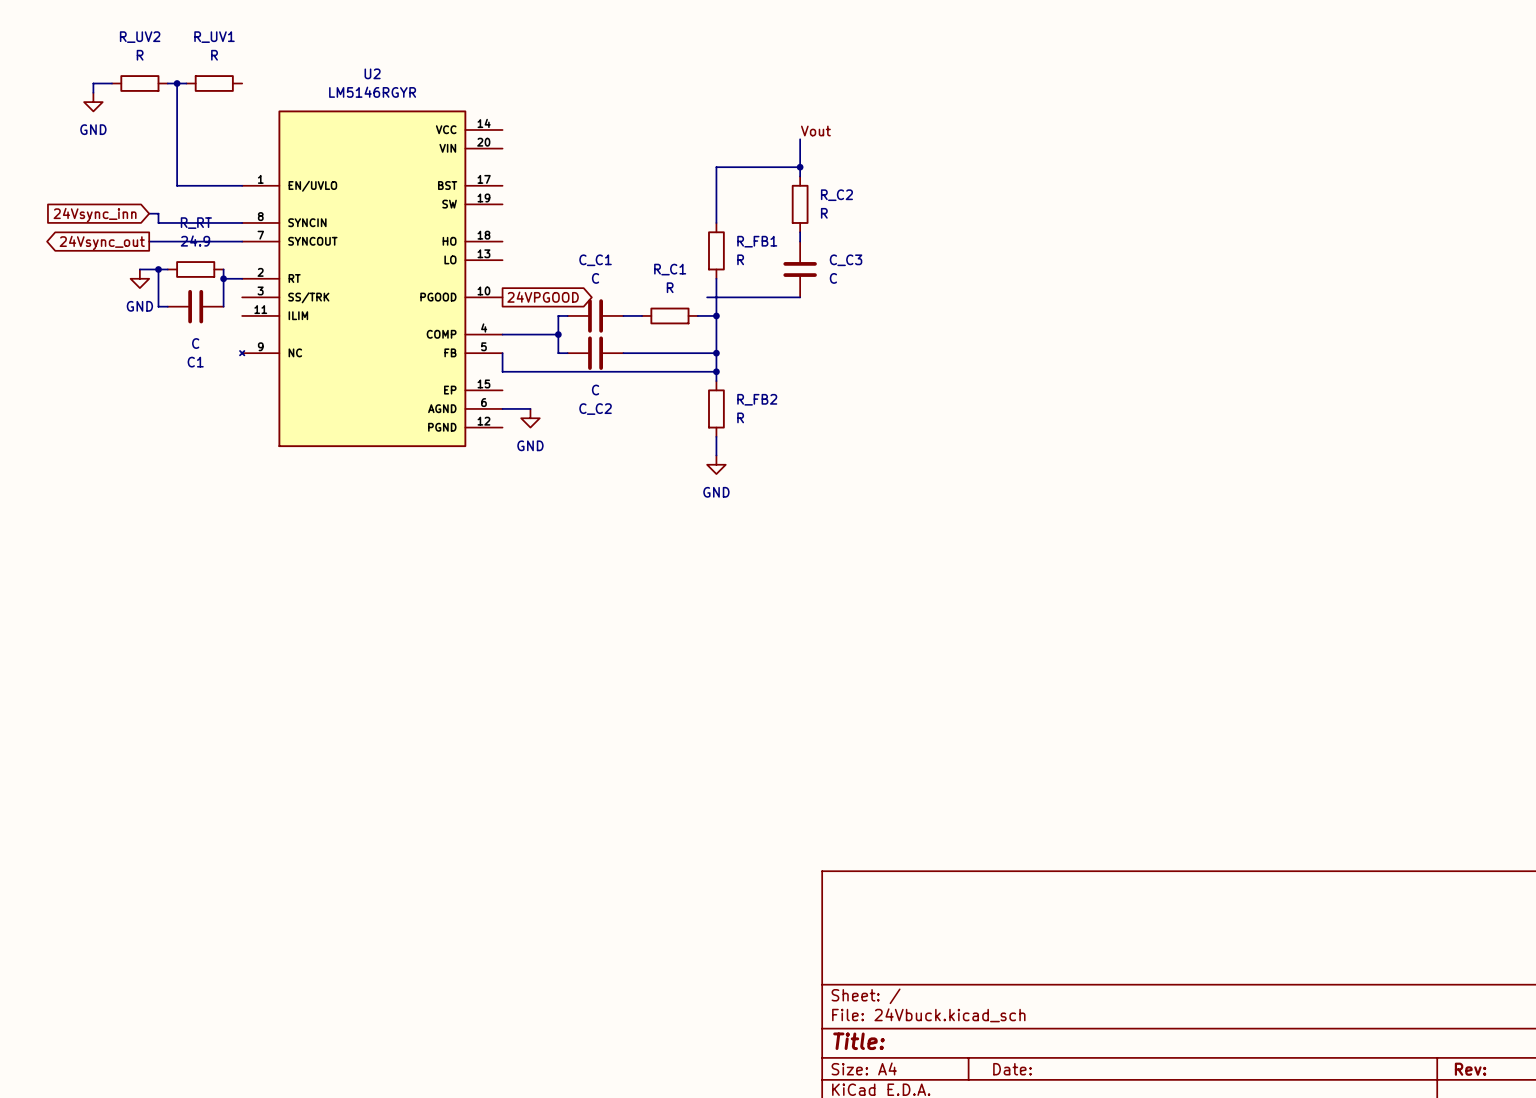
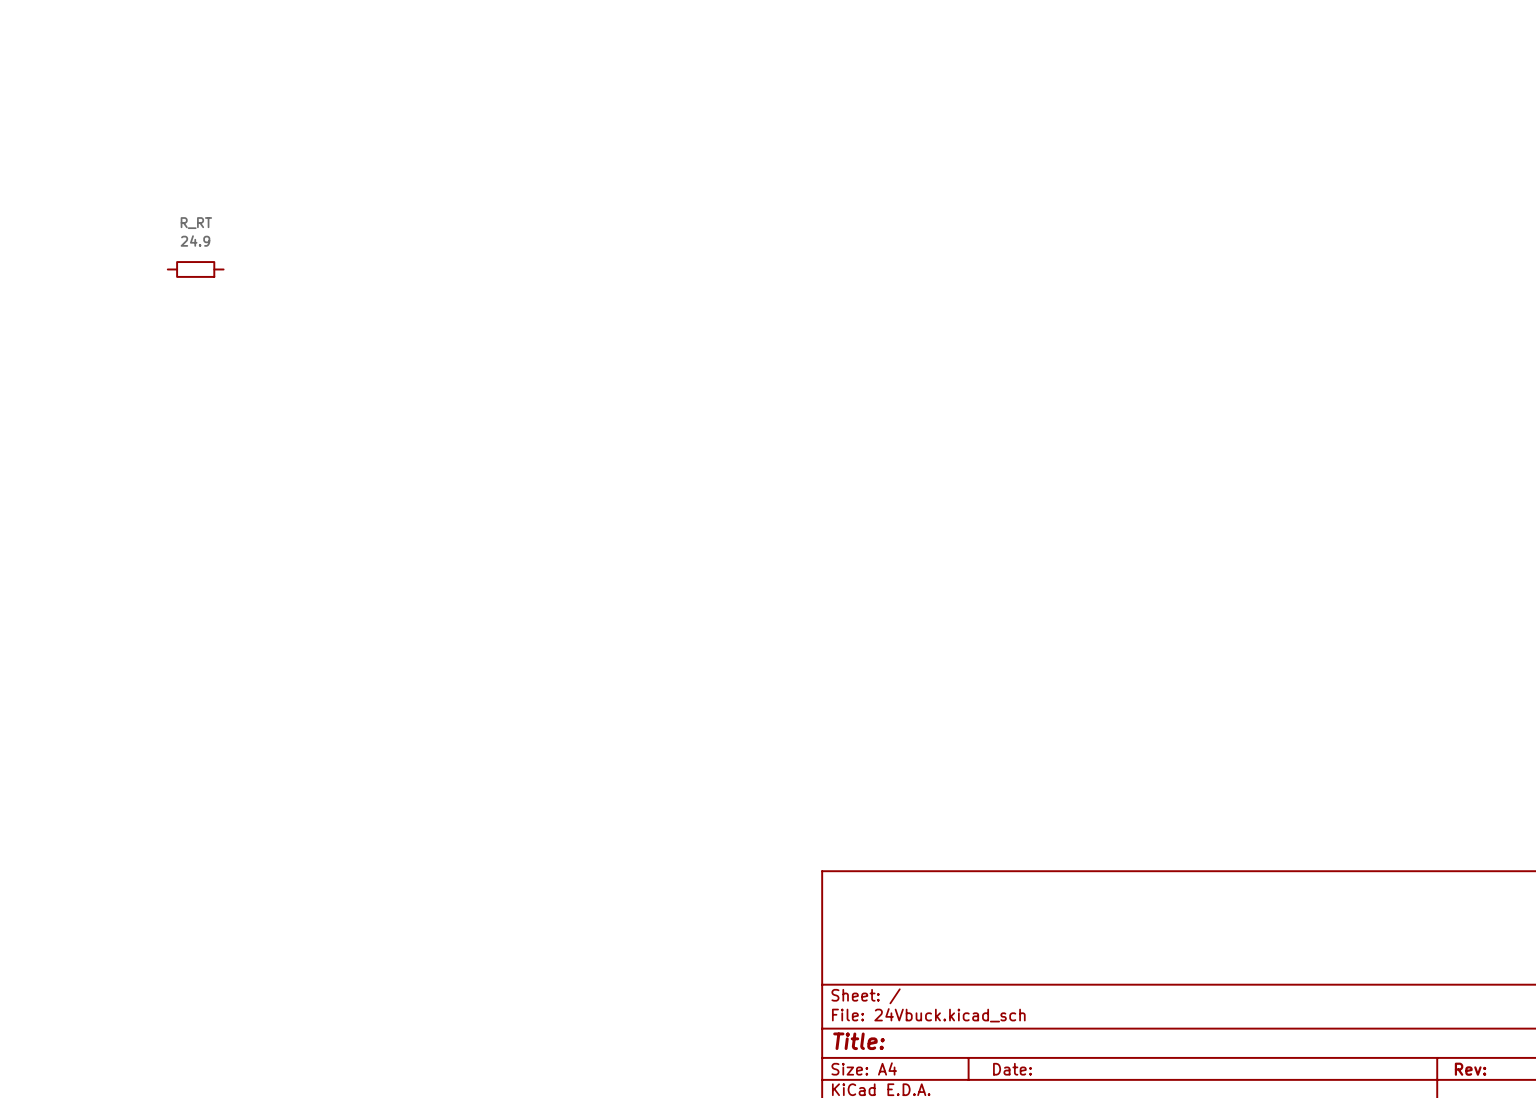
wire: (112, 83) (93, 83) (93, 92) -> none
R_UV2: R (139, 83) -> none
wire: (167, 83) (186, 83) -> none
wire: (177, 83) (177, 185) (242, 185) -> none
junction: (177, 83) -> none
R_UV1: R (214, 83) -> none
power symbol: GND (93, 102) -> none
label: Vout (815, 130) -> none
wire: (800, 139) (800, 176) -> none
wire: (800, 167) (716, 167) (716, 222) -> none
junction: (800, 167) -> none
R_C2: R (800, 204) -> none
wire: (149, 213) (158, 213) (158, 222) (242, 222) -> none
global label: 24Vsync_inn (95, 215) -> none
wire: (800, 232) (800, 241) -> none
wire: (149, 241) (242, 241) -> none
global label: 24Vsync_out (102, 242) -> none
R_FB1: R (716, 250) -> none
wire: (139, 269) (167, 269) -> none
wire: (158, 269) (158, 306) (167, 306) -> none
junction: (158, 269) -> none
wire: (223, 269) (223, 306) -> none
C_C3: C (800, 269) -> none
power symbol: GND (139, 278) -> none
wire: (223, 278) (242, 278) -> none
junction: (223, 278) -> none
U2: LM5146RGYR (371, 278) -> none
wire: (716, 278) (716, 381) -> none
global label: 24VPGOOD (543, 297) -> none
wire: (707, 297) (800, 297) -> none
C1: C (195, 306) -> none
wire: (567, 315) (558, 315) (558, 353) (567, 353) -> none
C_C1: C (595, 315) -> none
wire: (623, 315) (642, 315) -> none
R_C1: R (669, 315) -> none
wire: (697, 315) (716, 315) -> none
junction: (716, 315) -> none
wire: (502, 334) (558, 334) -> none
junction: (558, 334) -> none
wire: (502, 353) (502, 371) (716, 371) -> none
C_C2: C (595, 353) -> none
wire: (623, 353) (716, 353) -> none
junction: (716, 353) -> none
junction: (716, 371) -> none
wire: (502, 408) (530, 408) -> none
R_FB2: R (716, 408) -> none
power symbol: GND (530, 418) -> none
wire: (716, 436) (716, 455) -> none
power symbol: GND (716, 464) -> none

